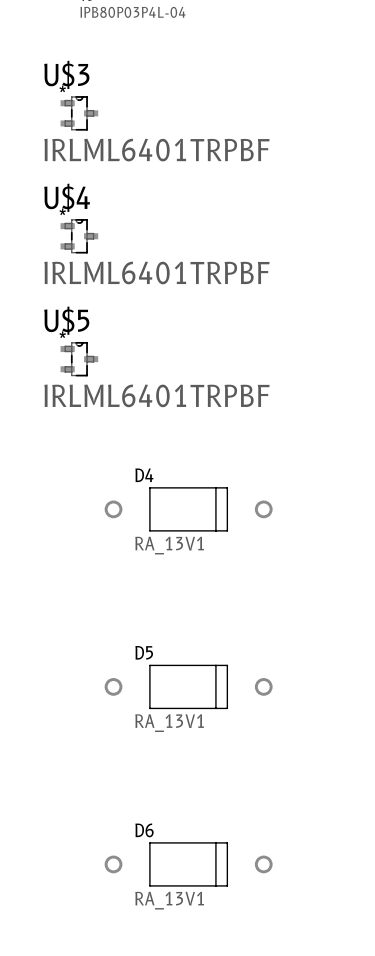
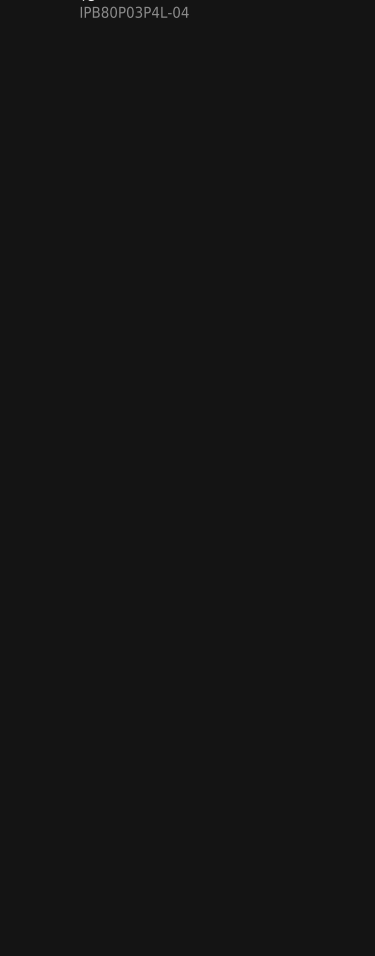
U$3: IRLML6401TRPBF (79, 113) -> none
U$4: IRLML6401TRPBF (79, 236) -> none
U$5: IRLML6401TRPBF (79, 359) -> none
D4: RA_13V1 (188, 509) -> none
D5: RA_13V1 (188, 686) -> none
D6: RA_13V1 (188, 864) -> none

